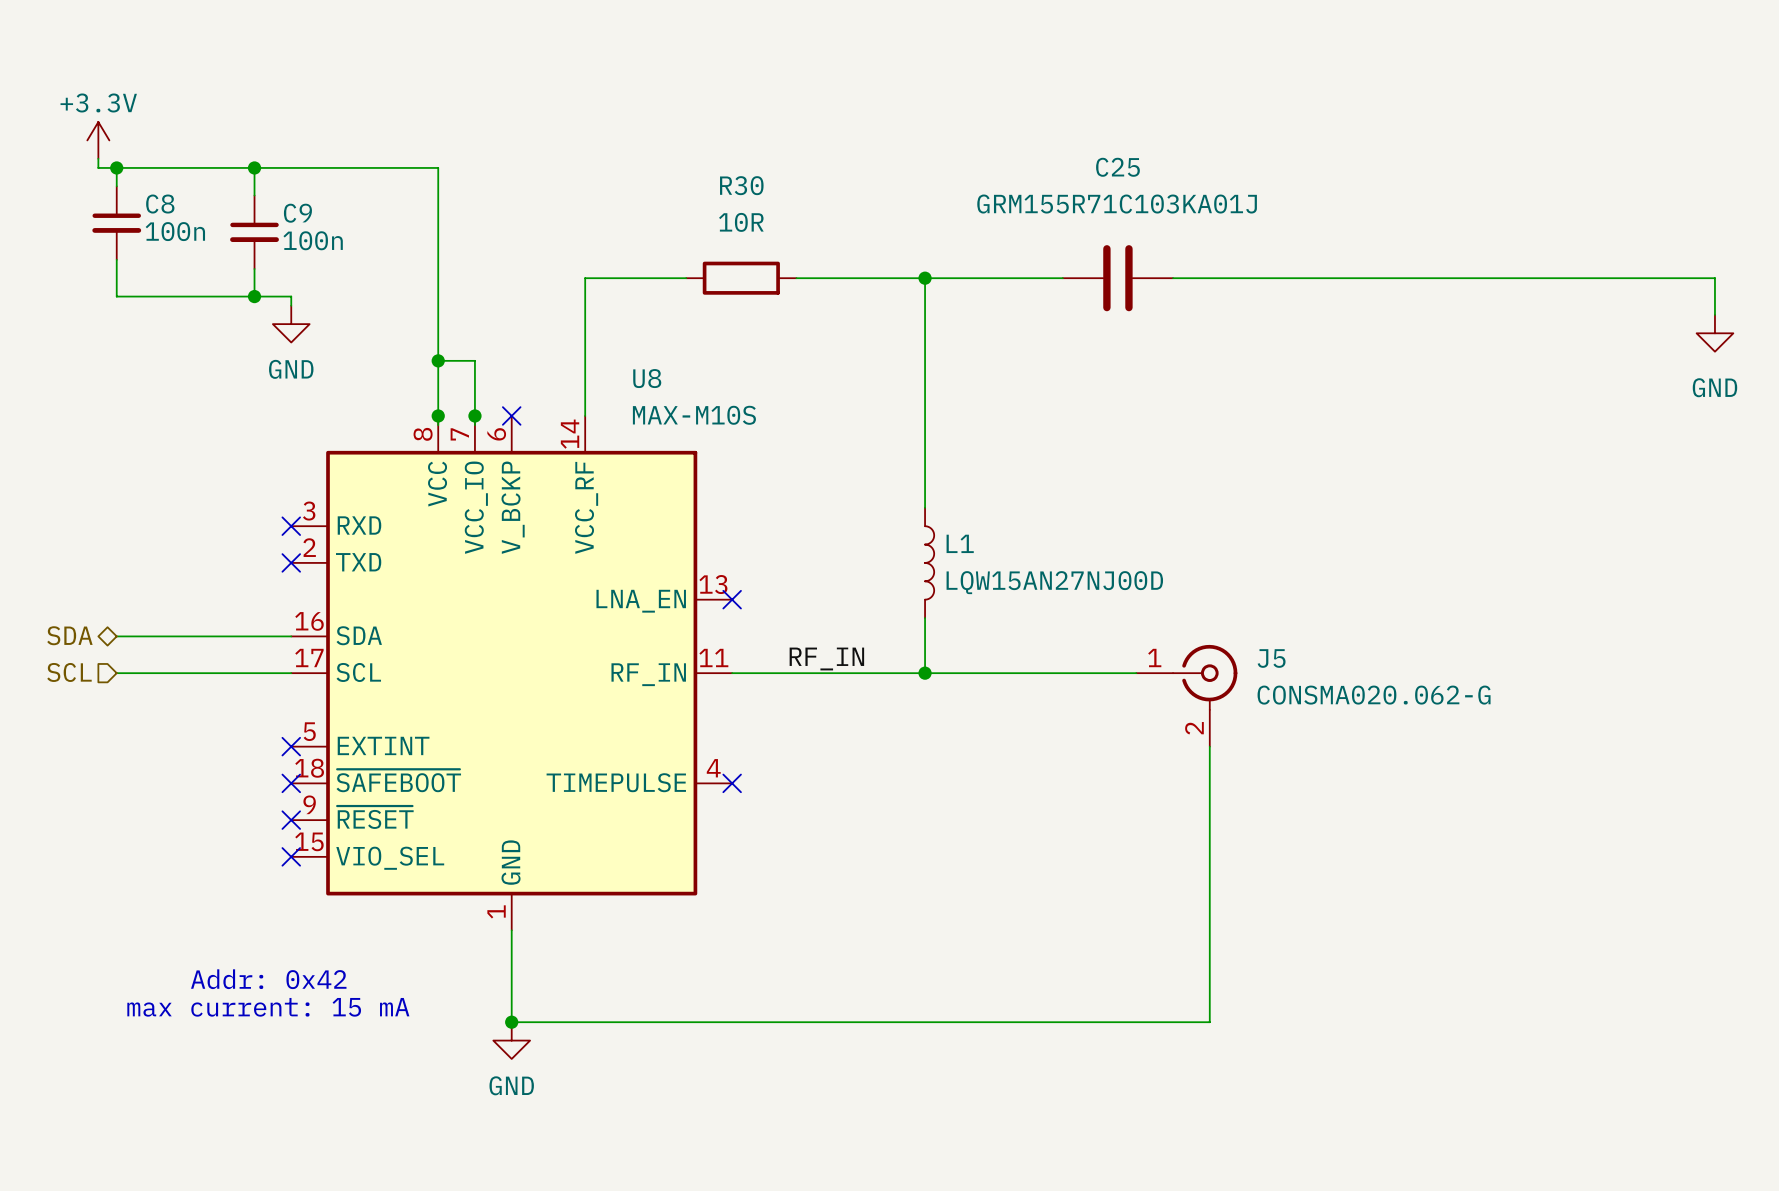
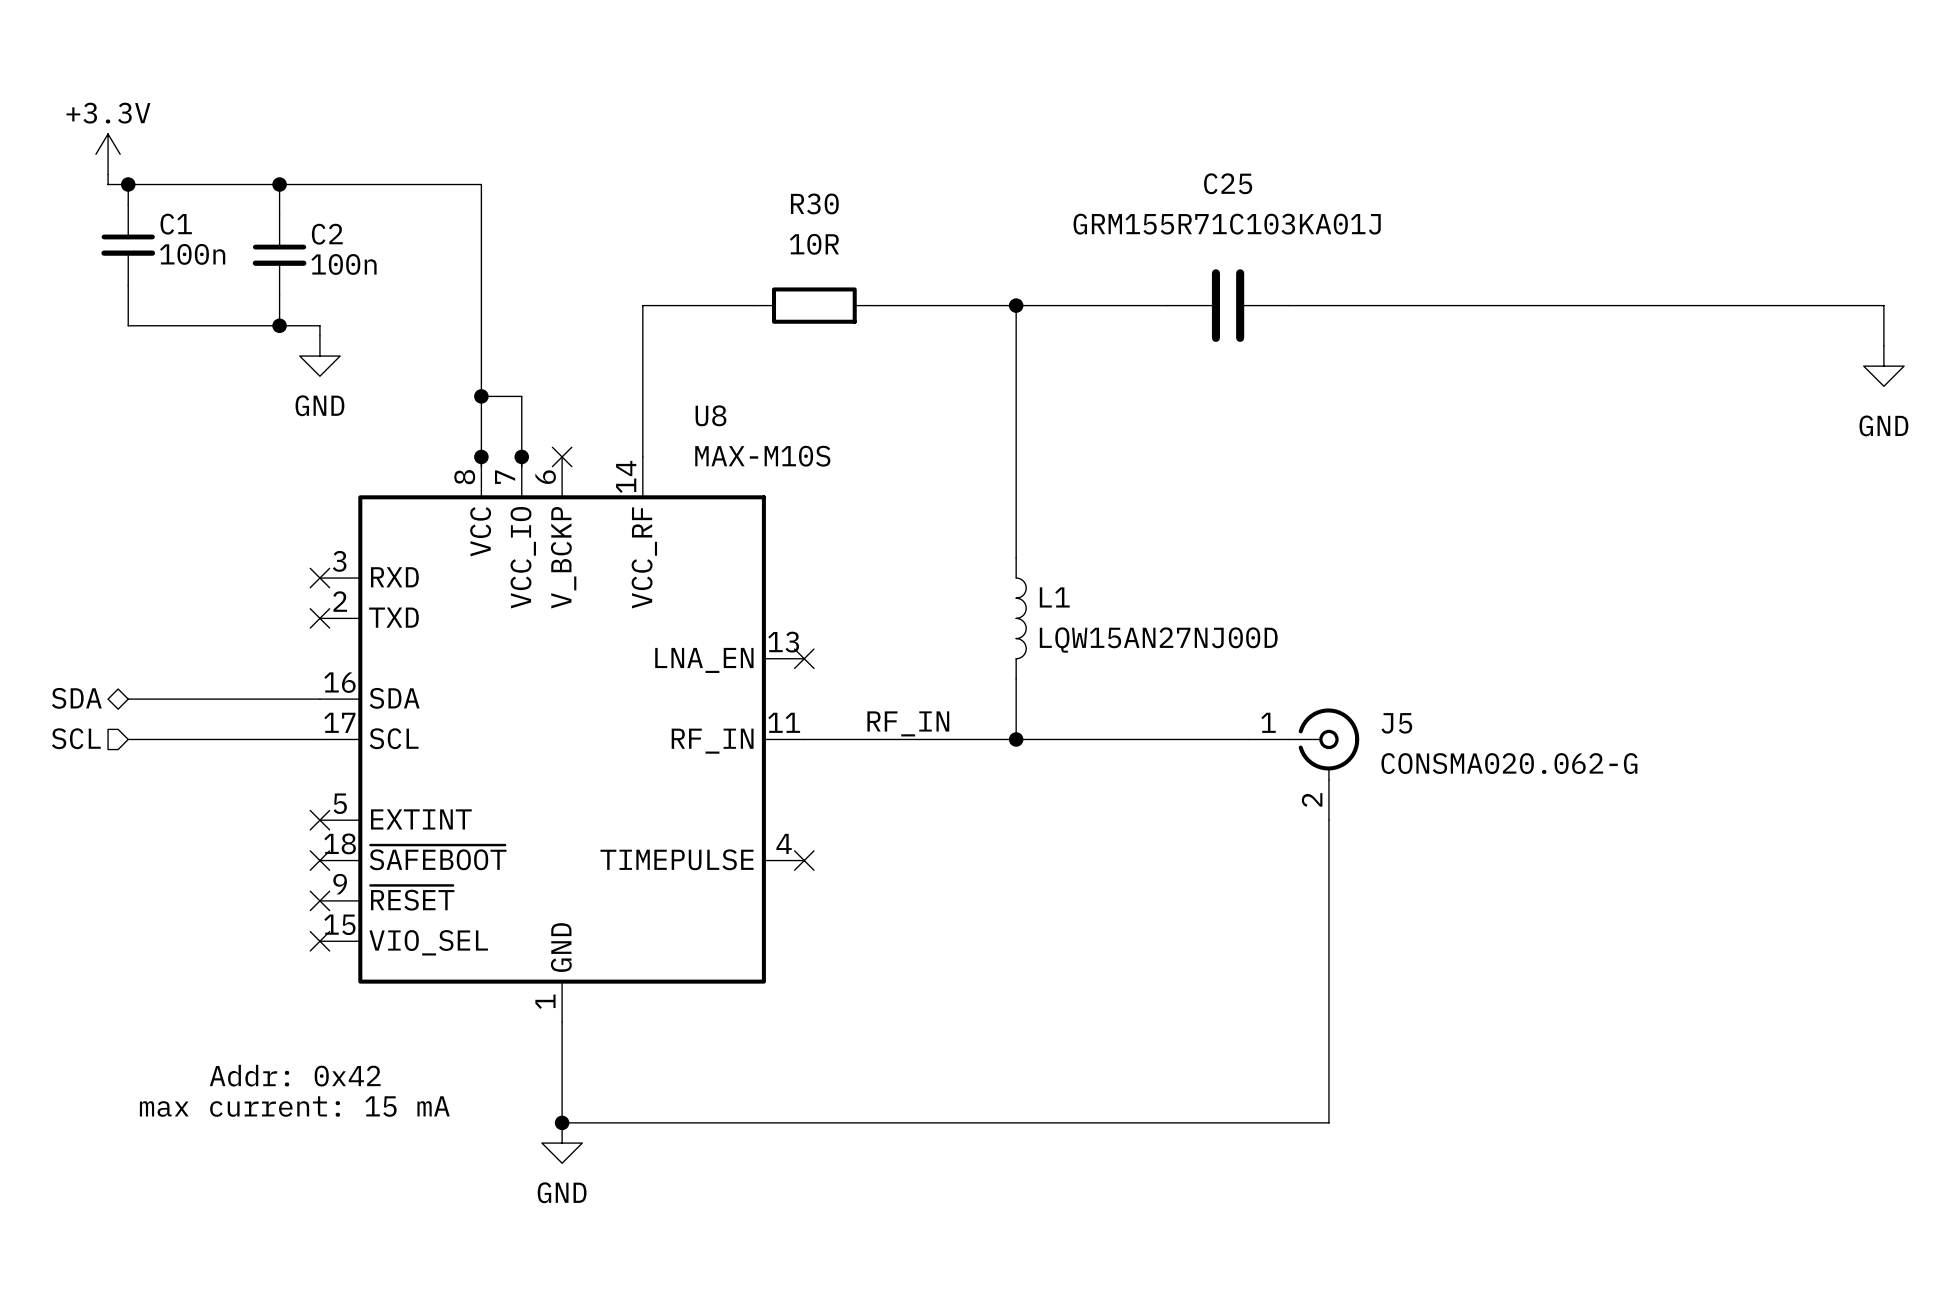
C8 name: C8 (160, 204) -> C1 (176, 224)
C9 name: C9 (297, 213) -> C2 (327, 234)

